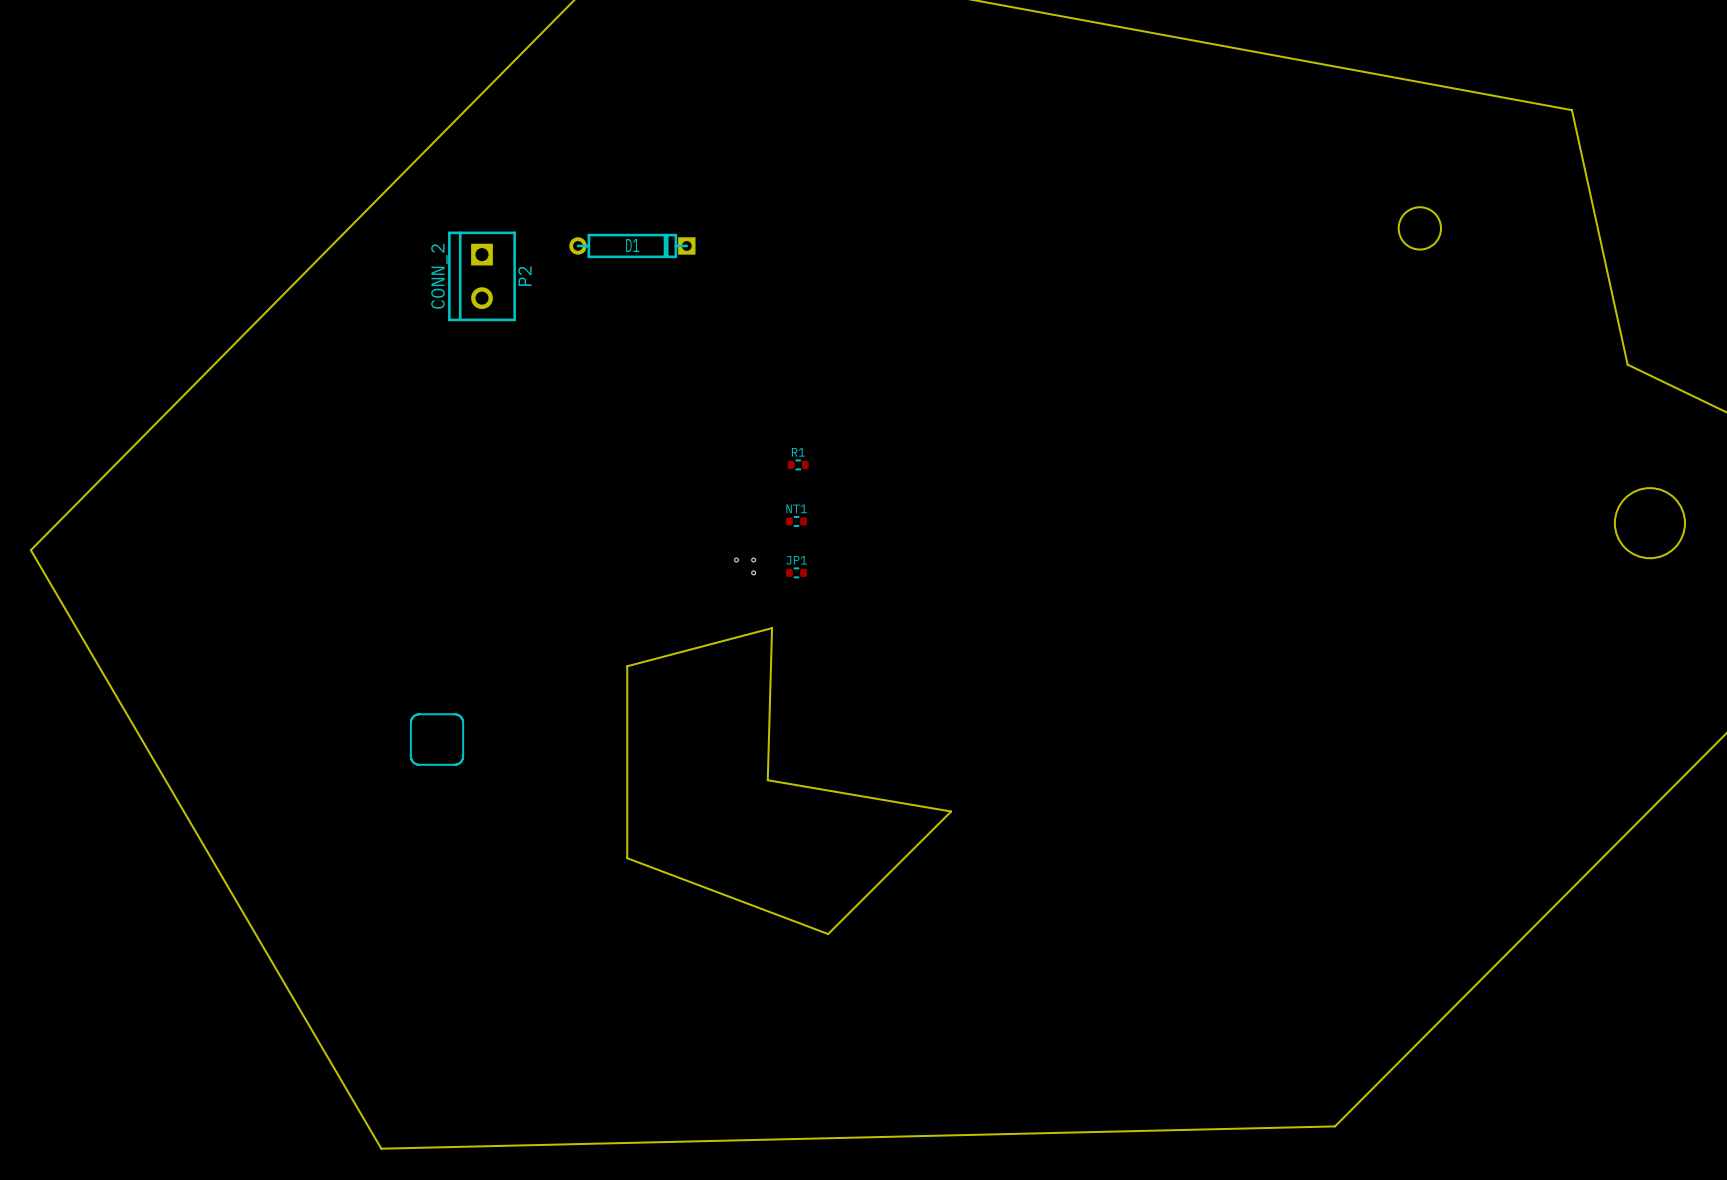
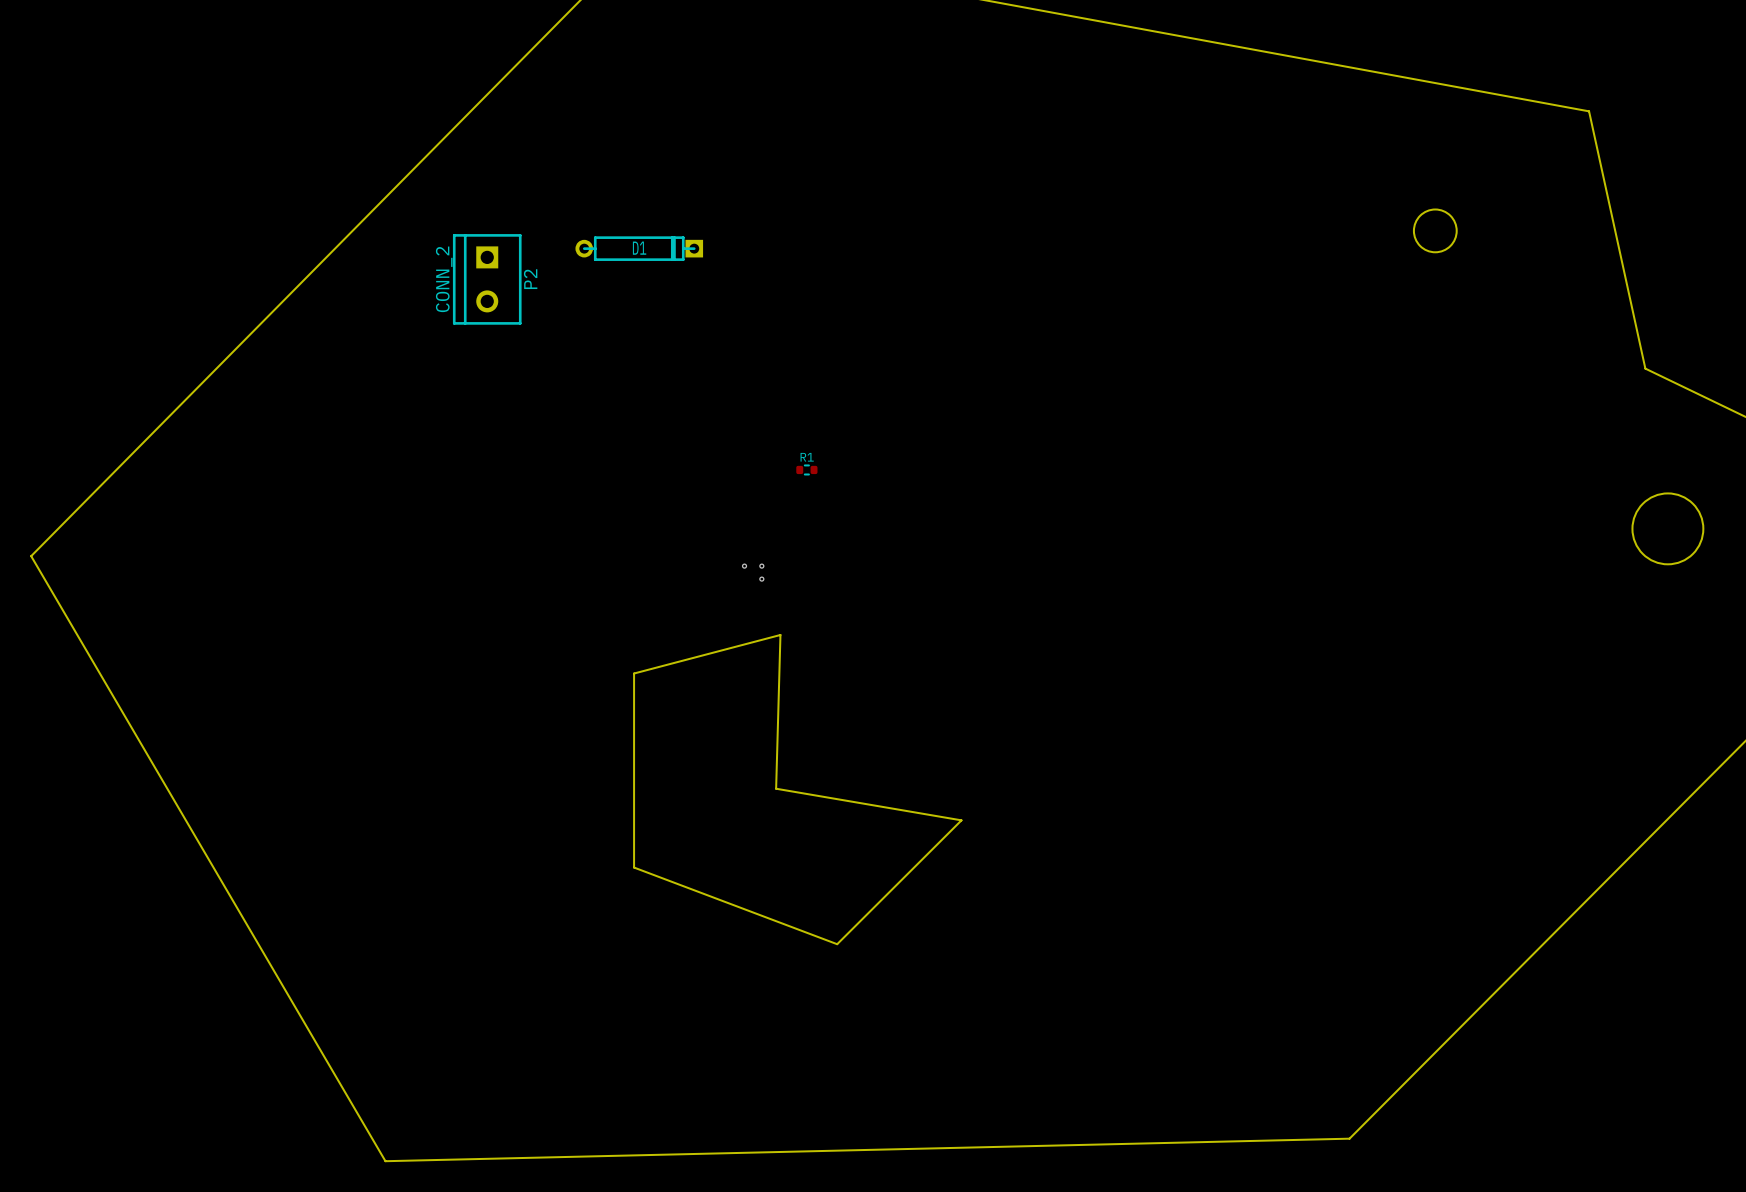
NT1: (796, 521) -> none
JP1: (796, 572) -> none
line: (419, 714) (455, 714) (461, 717) (463, 722) (463, 756) (459, 762) (454, 764) (419, 764) (412, 761) (410, 756) (410, 721) (413, 716) (419, 714) -> none

